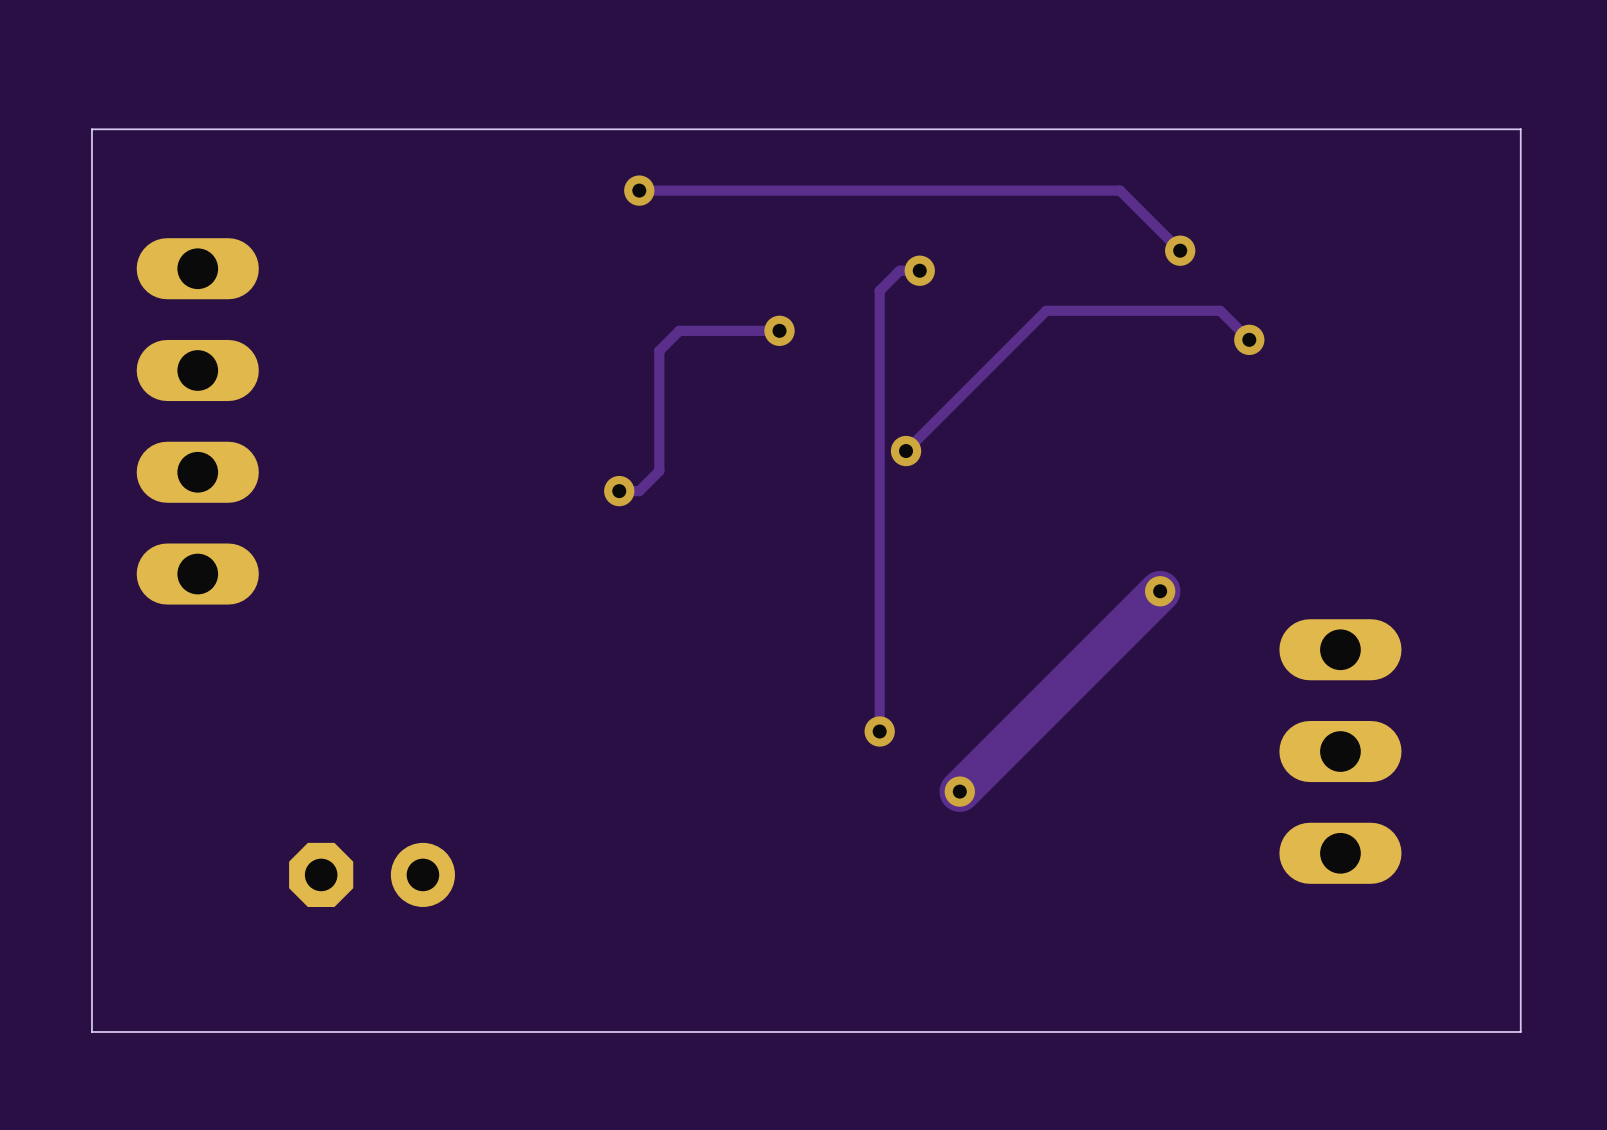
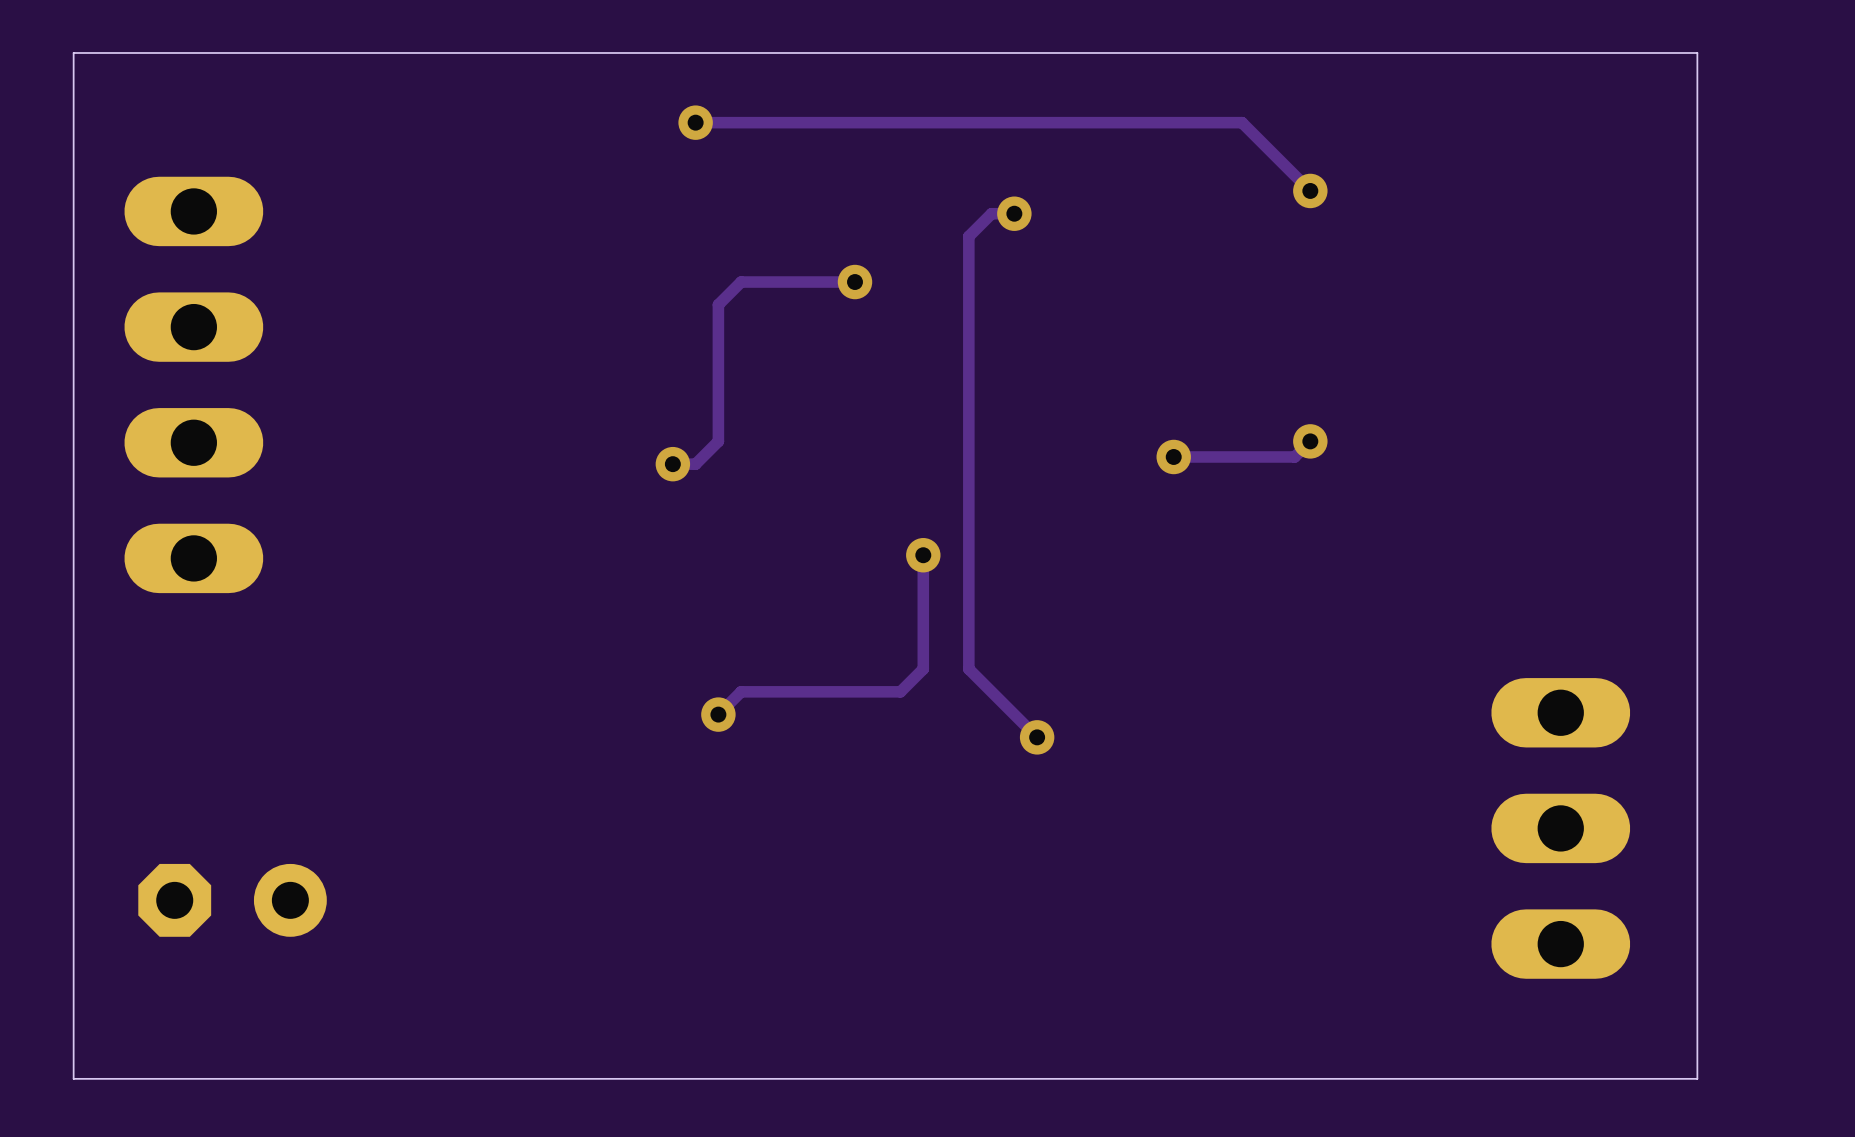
track: (1249, 339) (1220, 310) (1046, 310) (906, 451) -> none
via: (1249, 339) -> none
via: (906, 451) -> none
track: none -> (1310, 441) (1294, 456) (1173, 456)
via: none -> (1310, 441)
via: none -> (1173, 456)
track: none -> (923, 555) (923, 669) (900, 691) (741, 691) (718, 714)
via: none -> (923, 555)
track: (1160, 591) (959, 791) -> none
via: (1160, 591) -> none
track: (879, 671) (879, 731) -> (968, 669) (1037, 737)
via: none -> (718, 714)
via: (879, 731) -> none
via: none -> (1037, 737)
part position: (1340, 751) -> (1560, 828)
via: (959, 791) -> none
part position: (372, 874) -> (232, 900)

